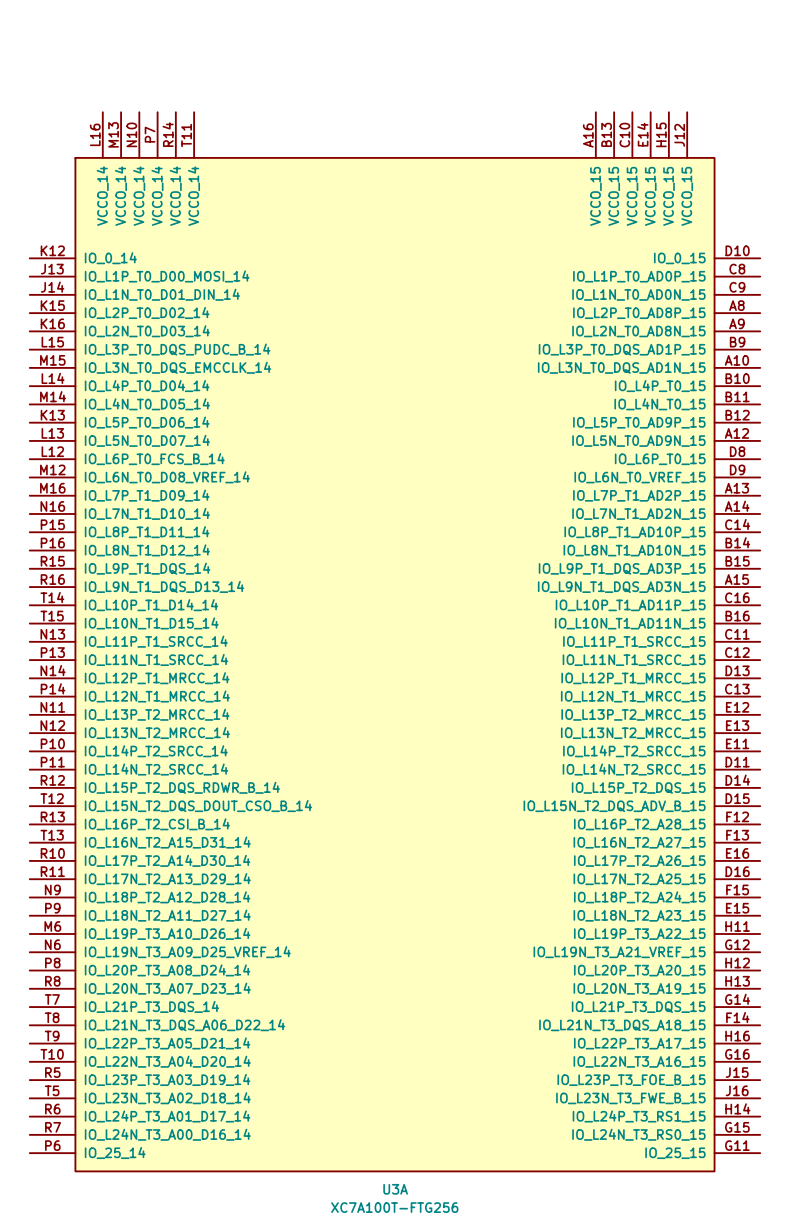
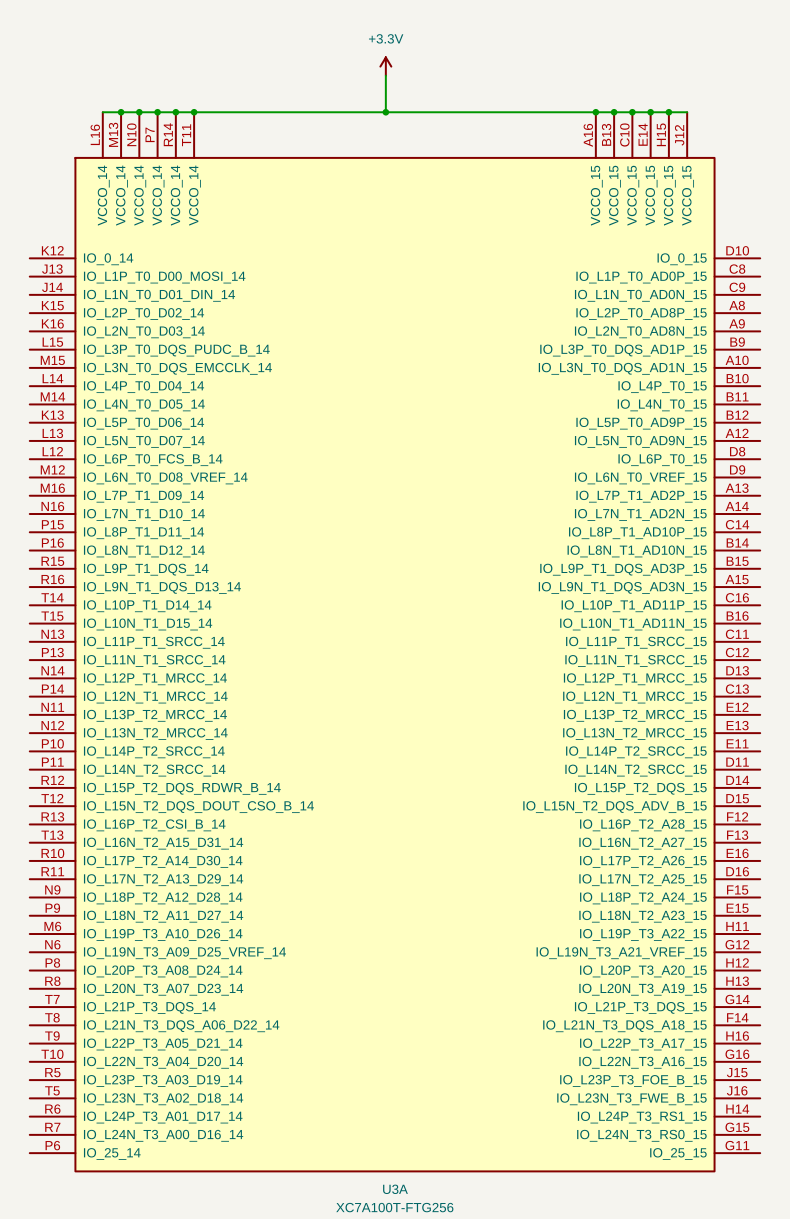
power symbol: none -> +3.3V (385, 66)
wire: none -> (385, 75) (385, 112)
wire: none -> (102, 112) (687, 112)
junction: none -> (121, 112)
junction: none -> (139, 112)
junction: none -> (157, 112)
junction: none -> (175, 112)
junction: none -> (194, 112)
junction: none -> (385, 112)
junction: none -> (595, 112)
junction: none -> (614, 112)
junction: none -> (632, 112)
junction: none -> (650, 112)
junction: none -> (668, 112)

